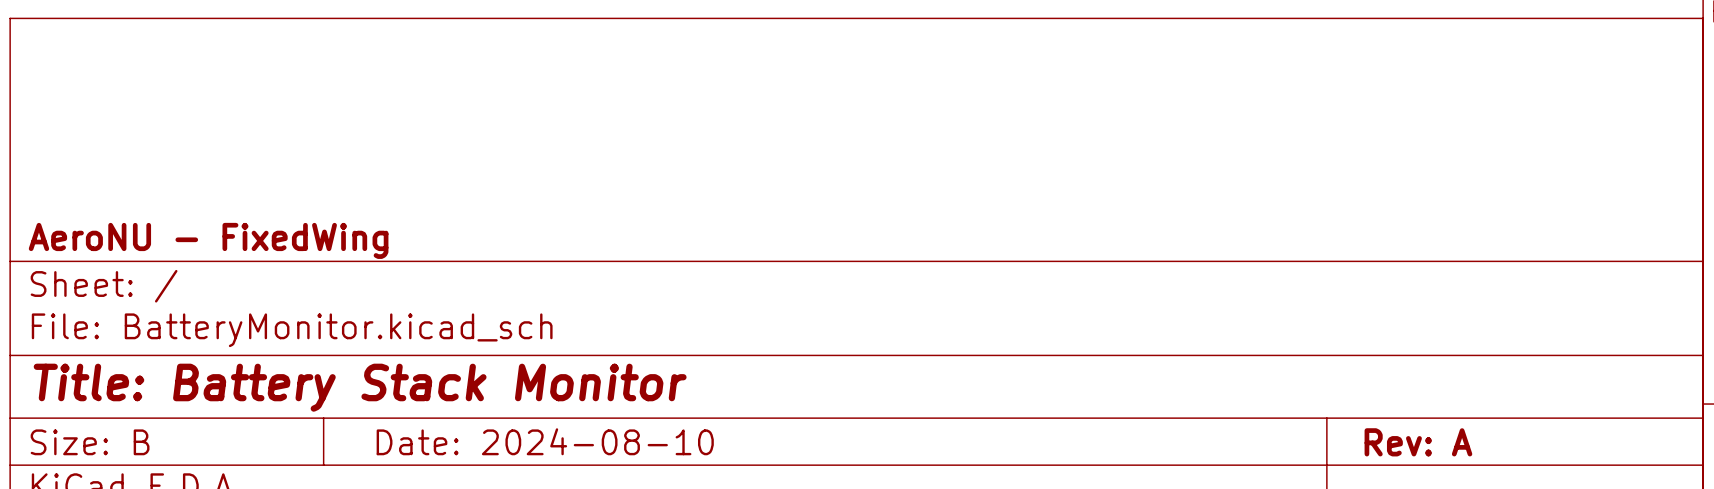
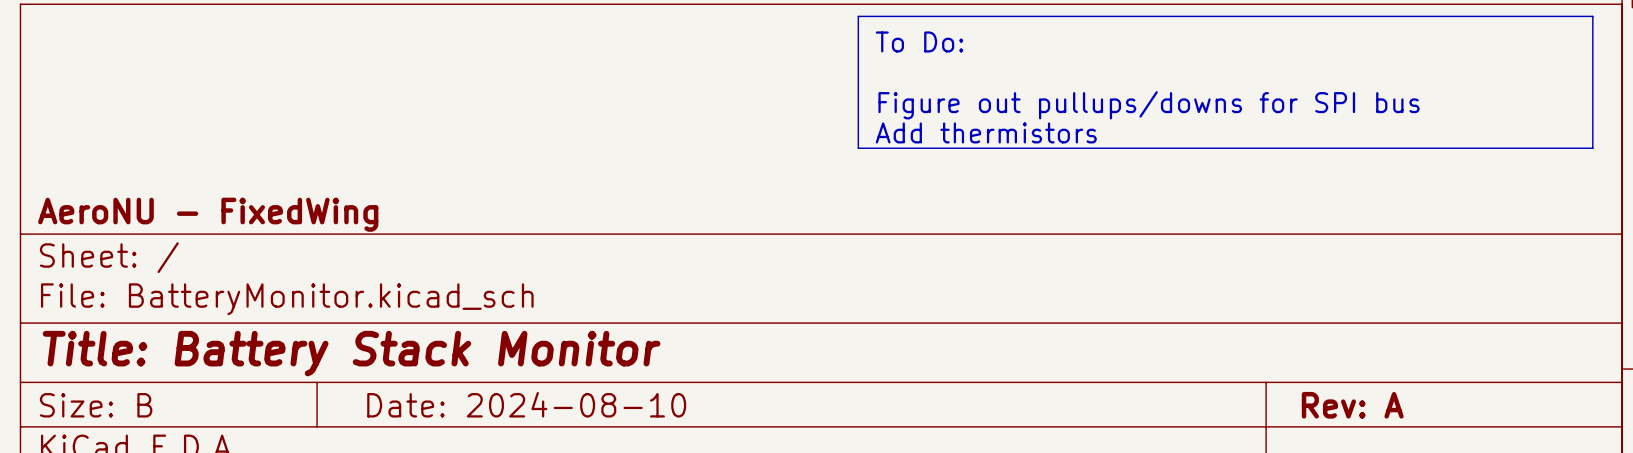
line: none -> (858, 16) (1592, 16) (1592, 148) (858, 148) (858, 16)
text: none -> To Do: (919, 41)
text: none -> Figure out pullups/downs for SPI bus (1149, 105)
text: none -> Add thermistors (986, 132)

